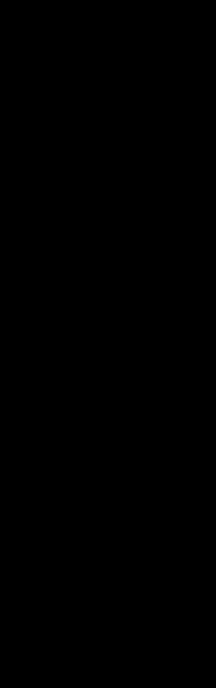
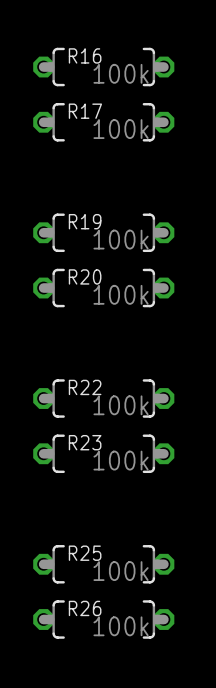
R16: none -> 100k (103, 67)
R17: none -> 100k (103, 122)
R19: none -> 100k (103, 232)
R20: none -> 100k (103, 288)
R22: none -> 100k (103, 398)
R23: none -> 100k (103, 453)
R25: none -> 100k (103, 564)
R26: none -> 100k (103, 619)

